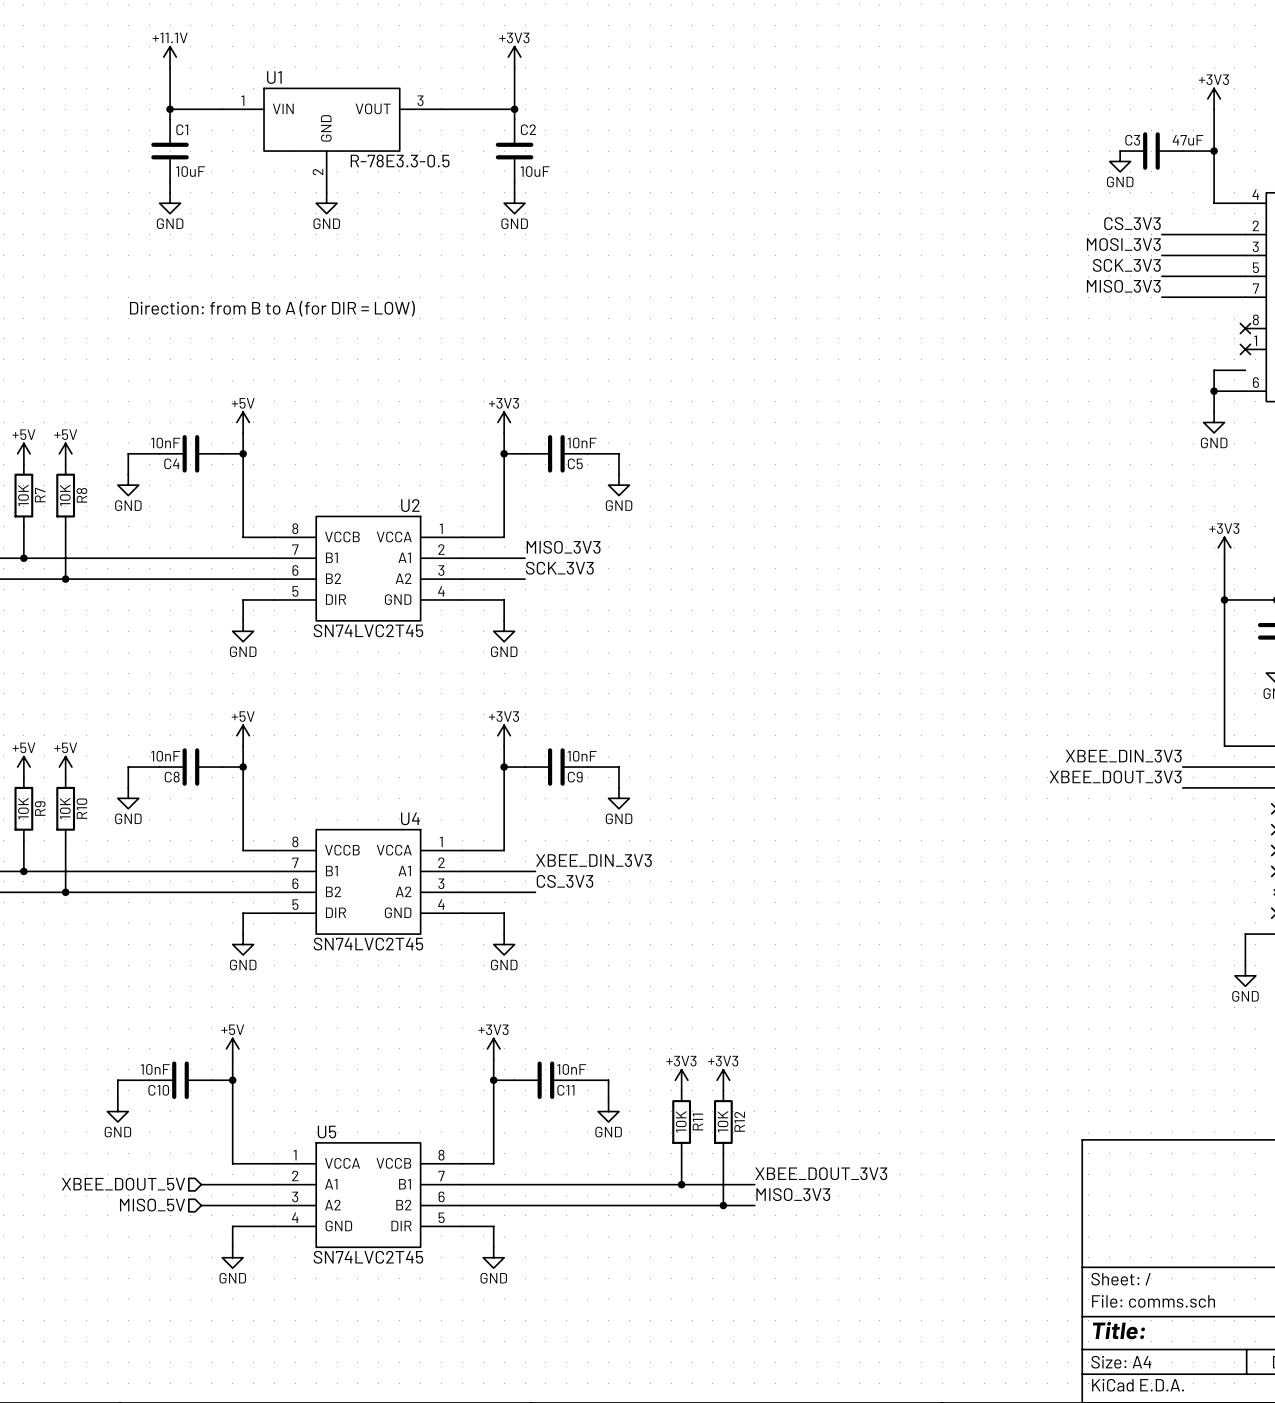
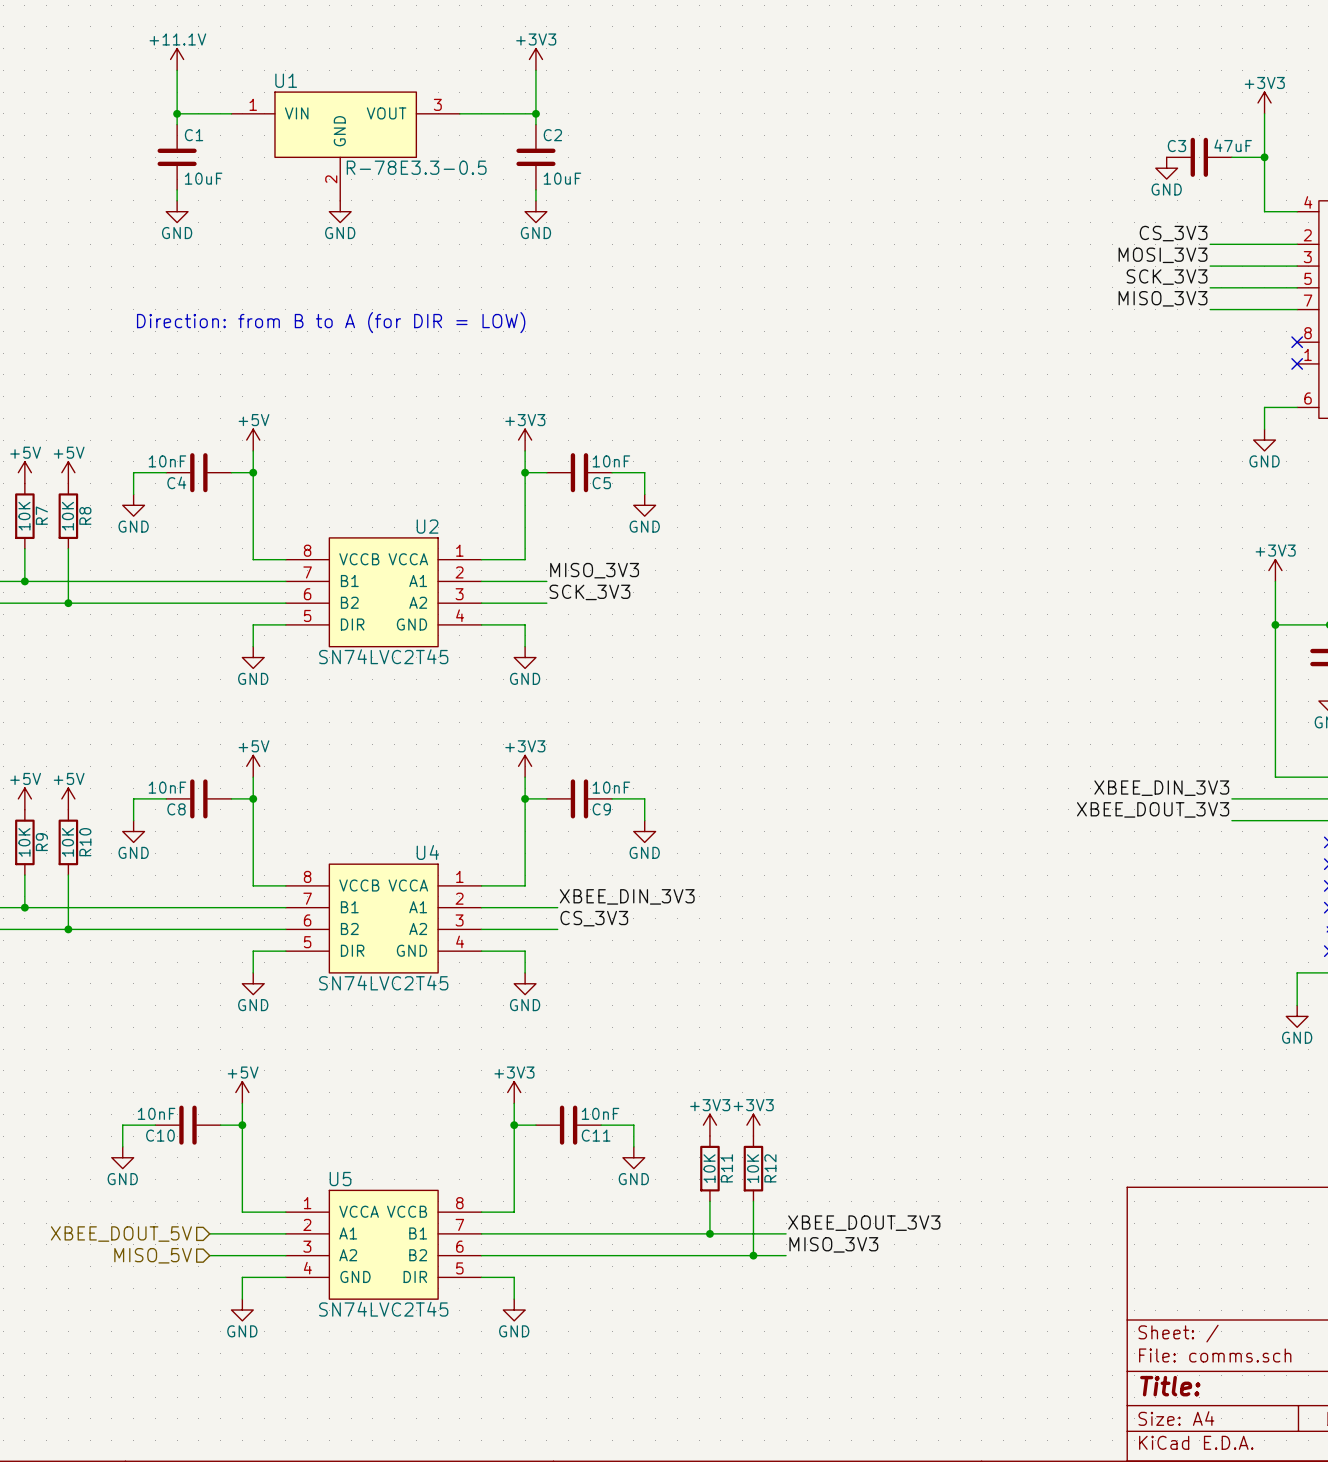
wire: (1245, 370) (1214, 370) (1214, 391) -> none
junction: (1214, 391) -> none

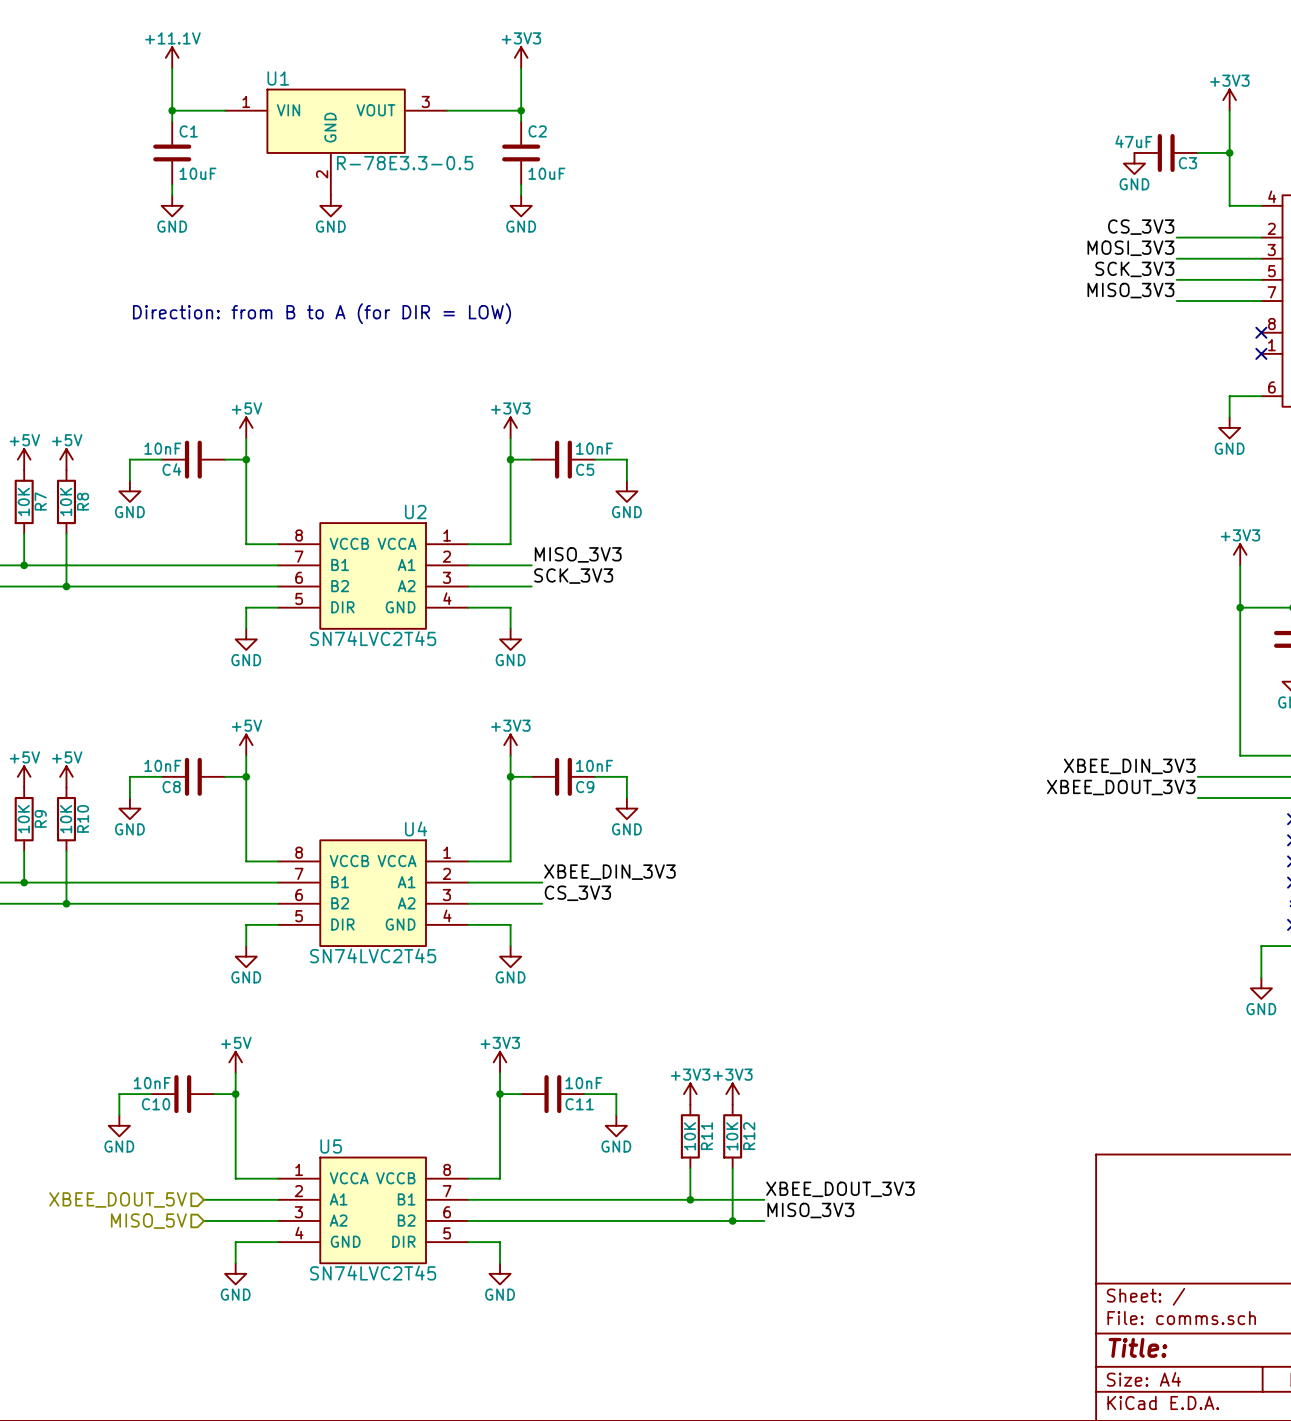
C3 value position: 47uF (1233, 145) -> 47uF (1133, 141)
C3 name position: C3 (1176, 146) -> C3 (1187, 163)

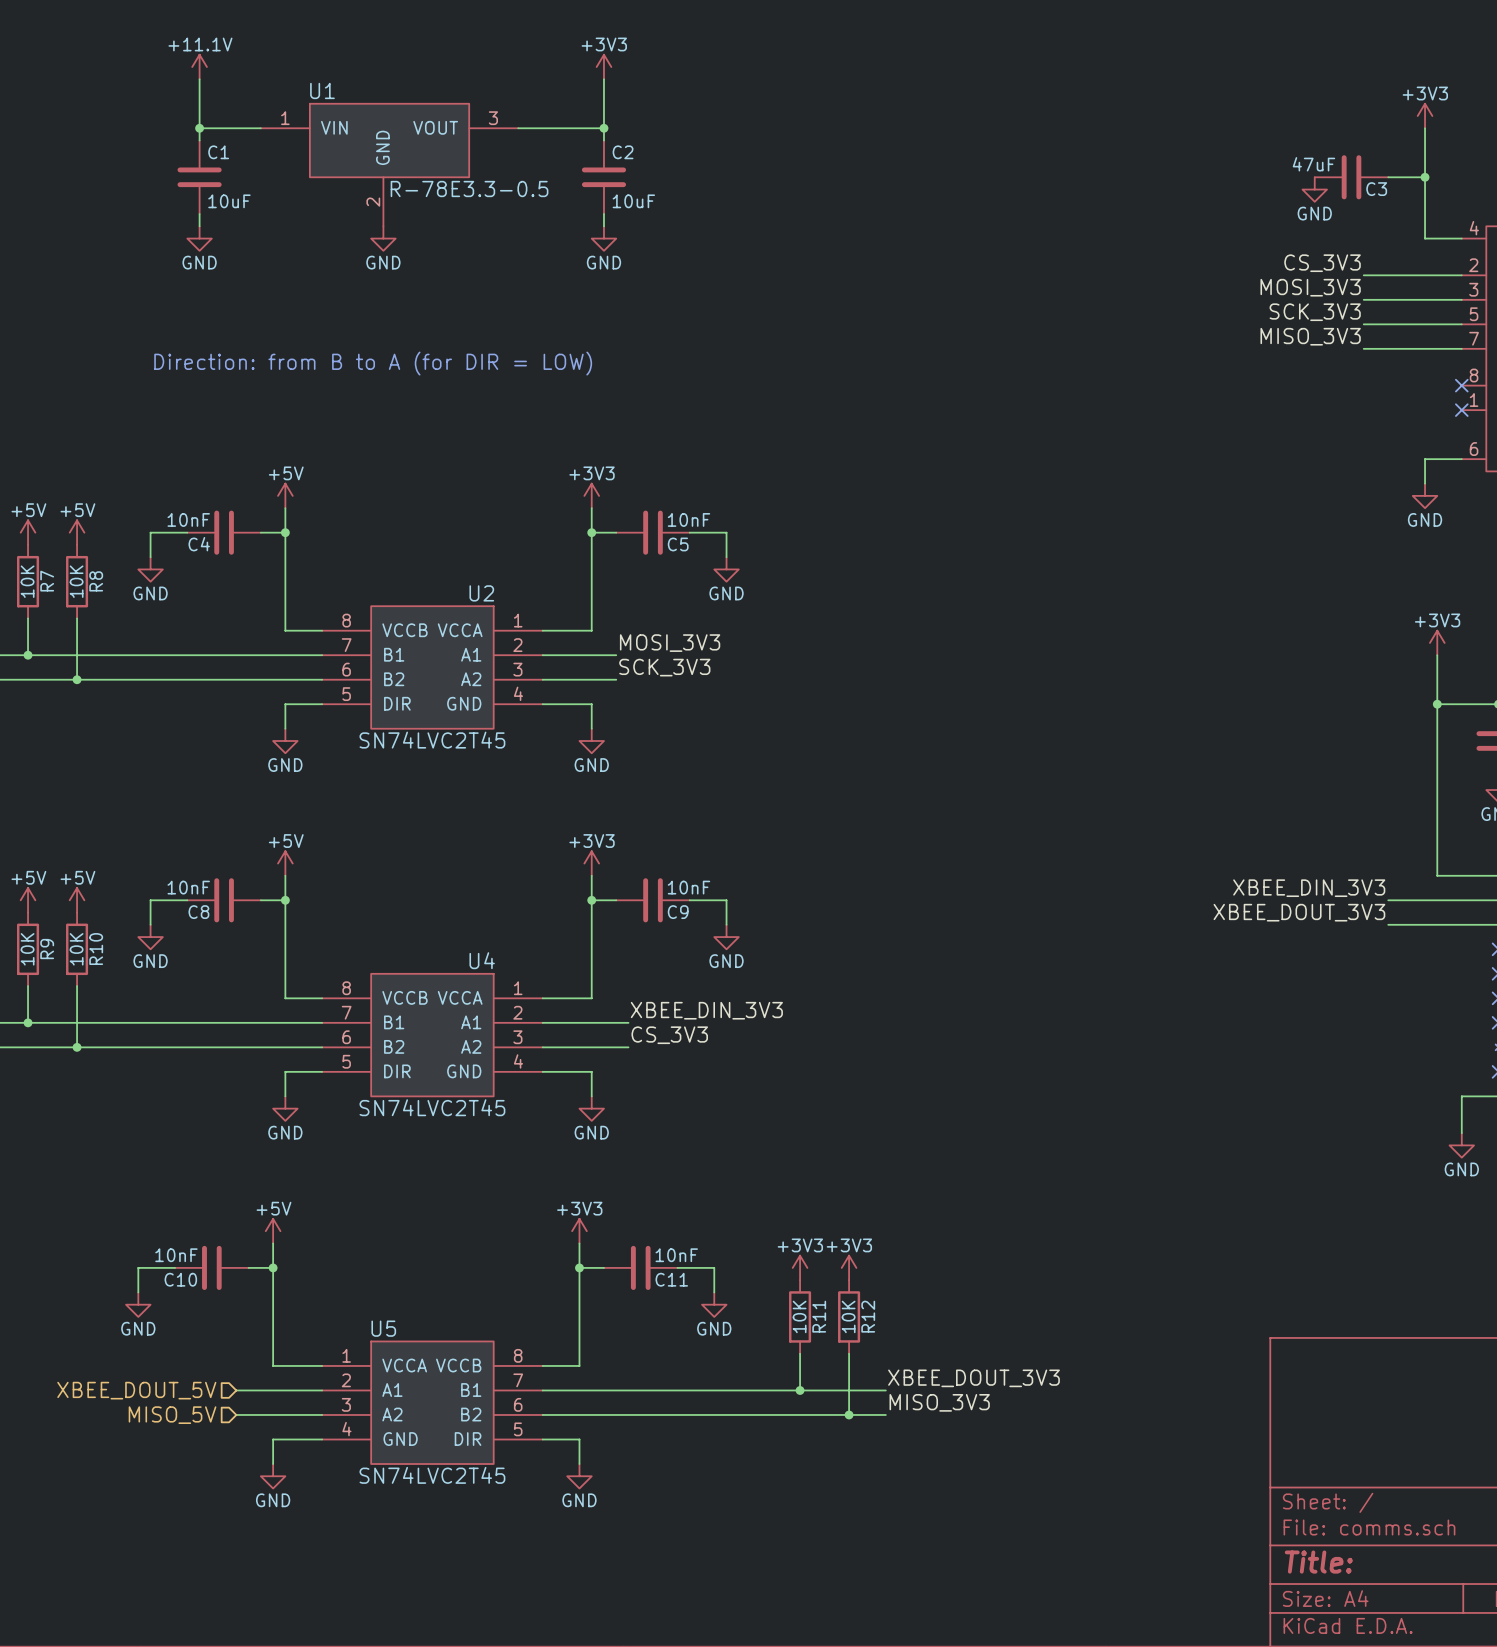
label: MISO_3V3 (578, 554) -> MOSI_3V3 (670, 643)

